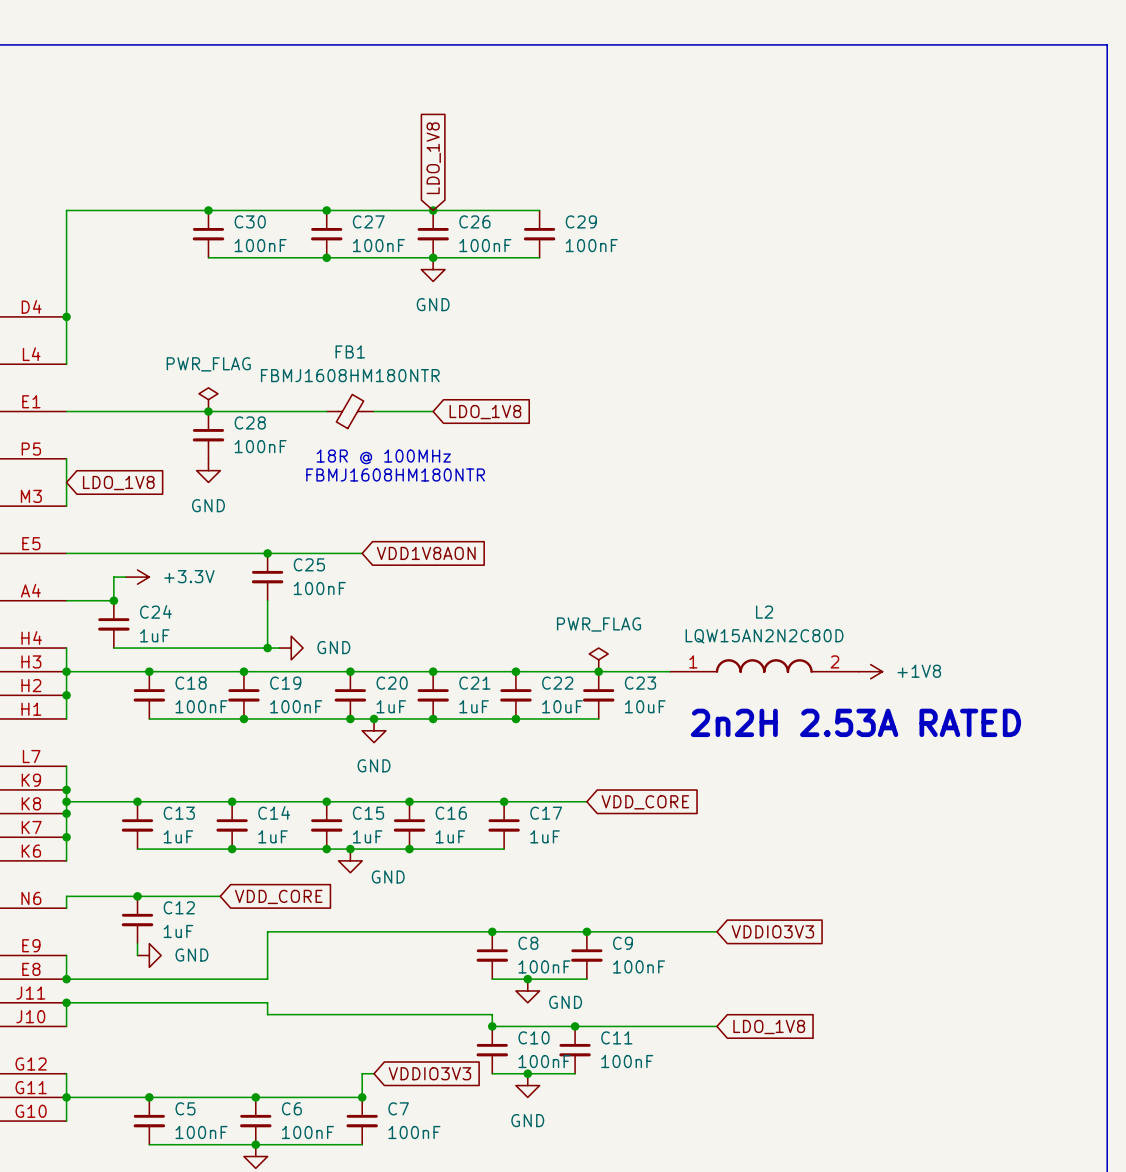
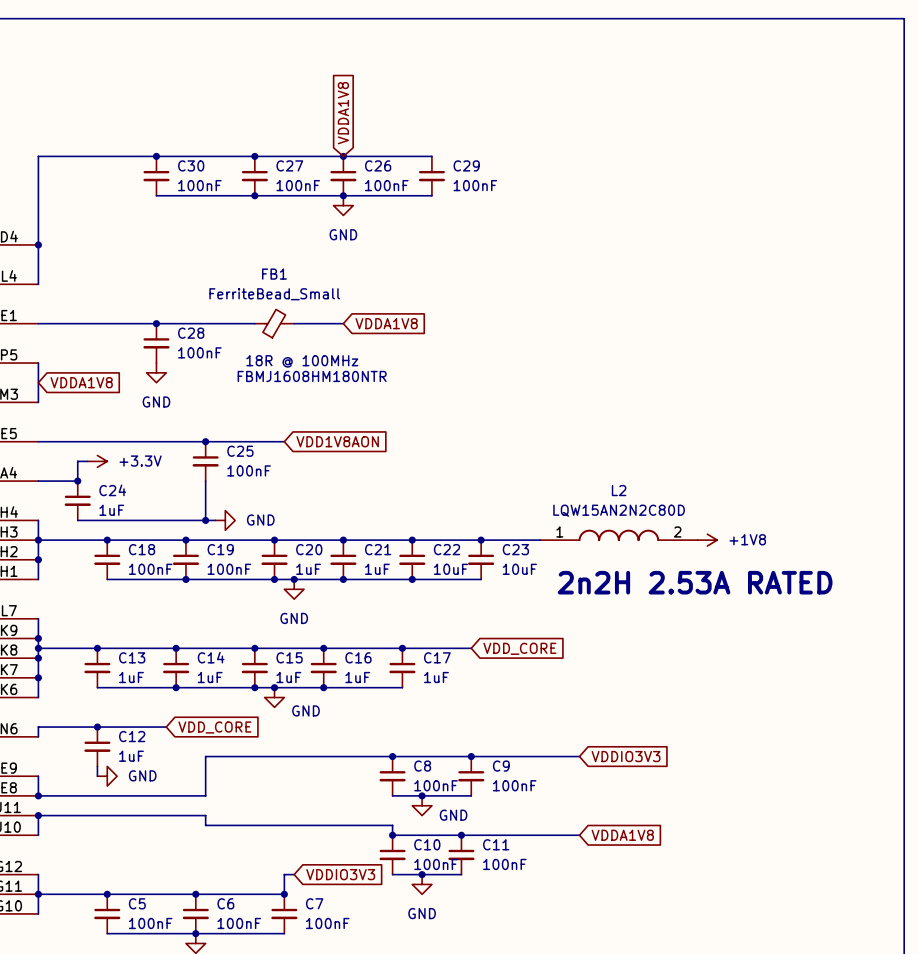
global label: LDO_1V8 (433, 158) -> VDDA1V8 (343, 113)
FB1 value: FBMJ1608HM180NTR (350, 375) -> FerriteBead_Small (274, 294)
power symbol: PWR_FLAG (208, 399) -> none
global label: LDO_1V8 (485, 412) -> VDDA1V8 (386, 323)
global label: LDO_1V8 (118, 483) -> VDDA1V8 (81, 382)
power symbol: PWR_FLAG (598, 659) -> none
global label: LDO_1V8 (769, 1027) -> VDDA1V8 (622, 835)

